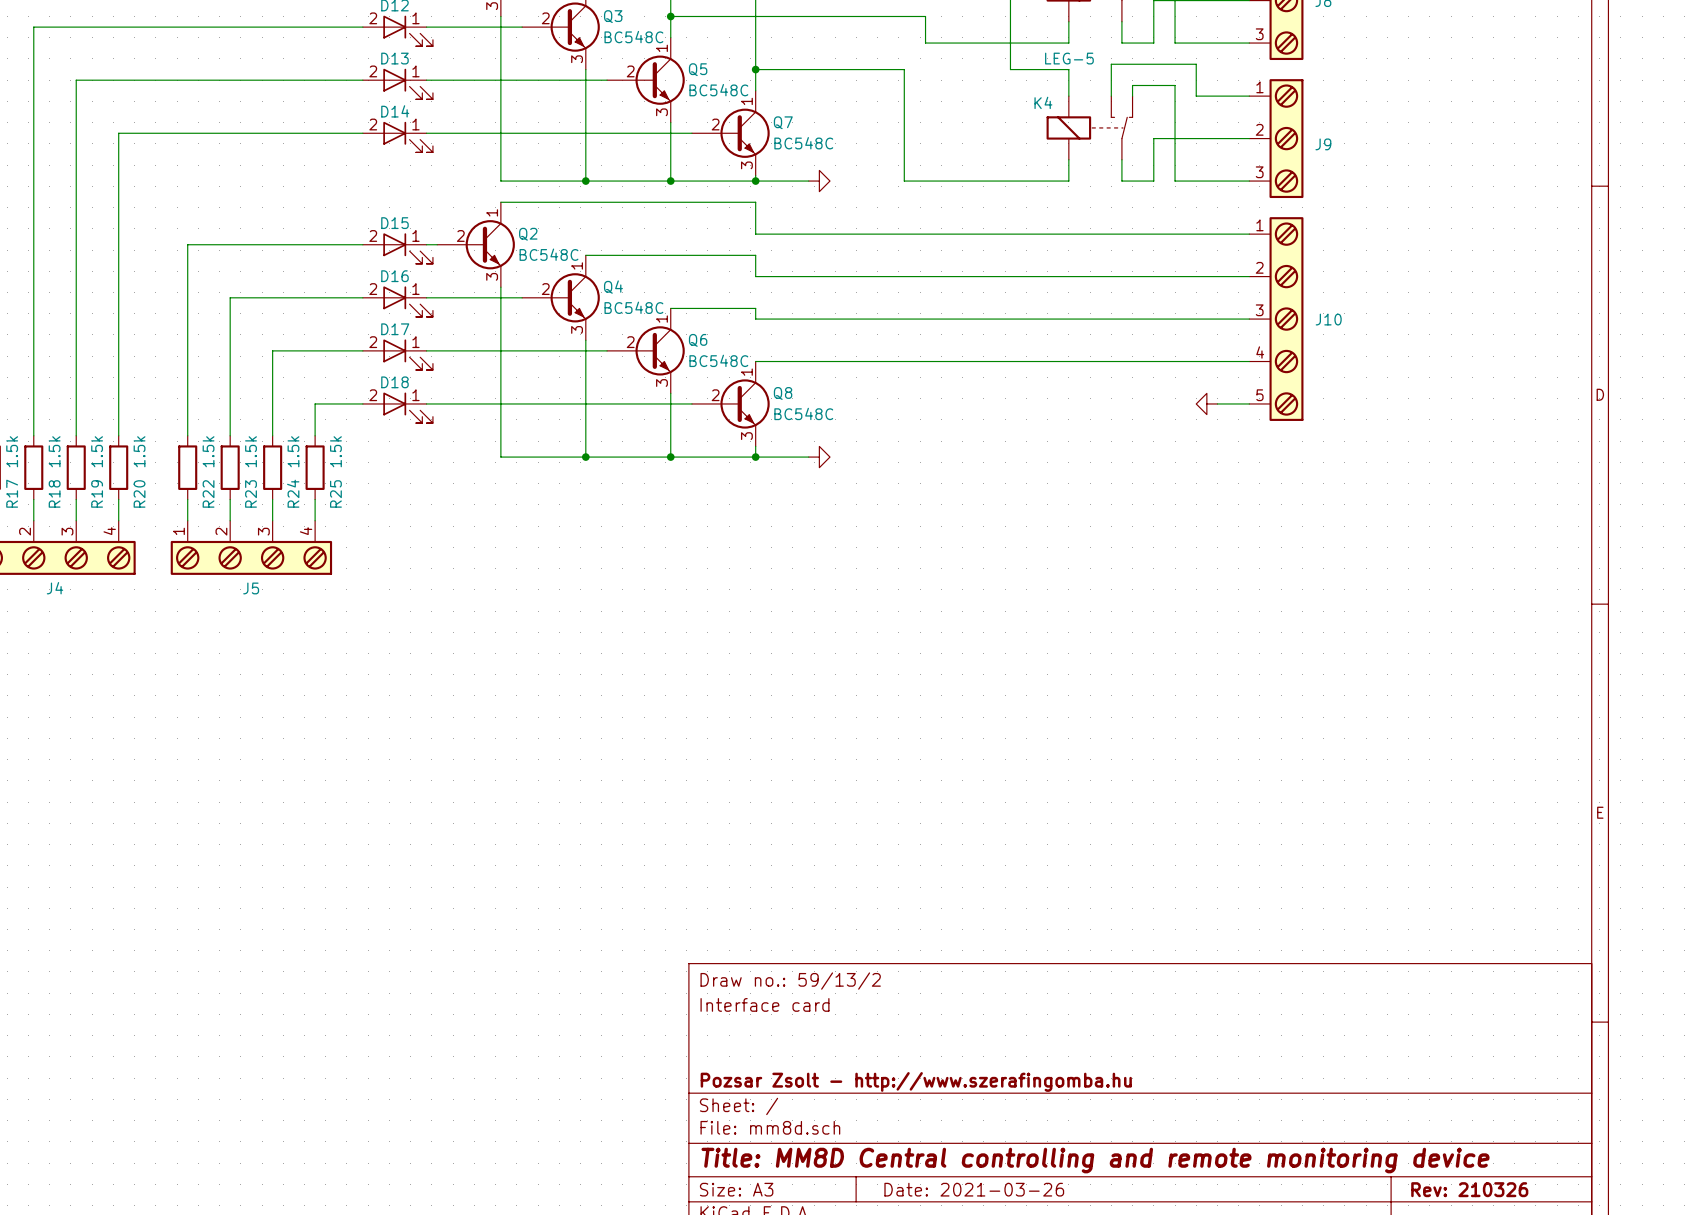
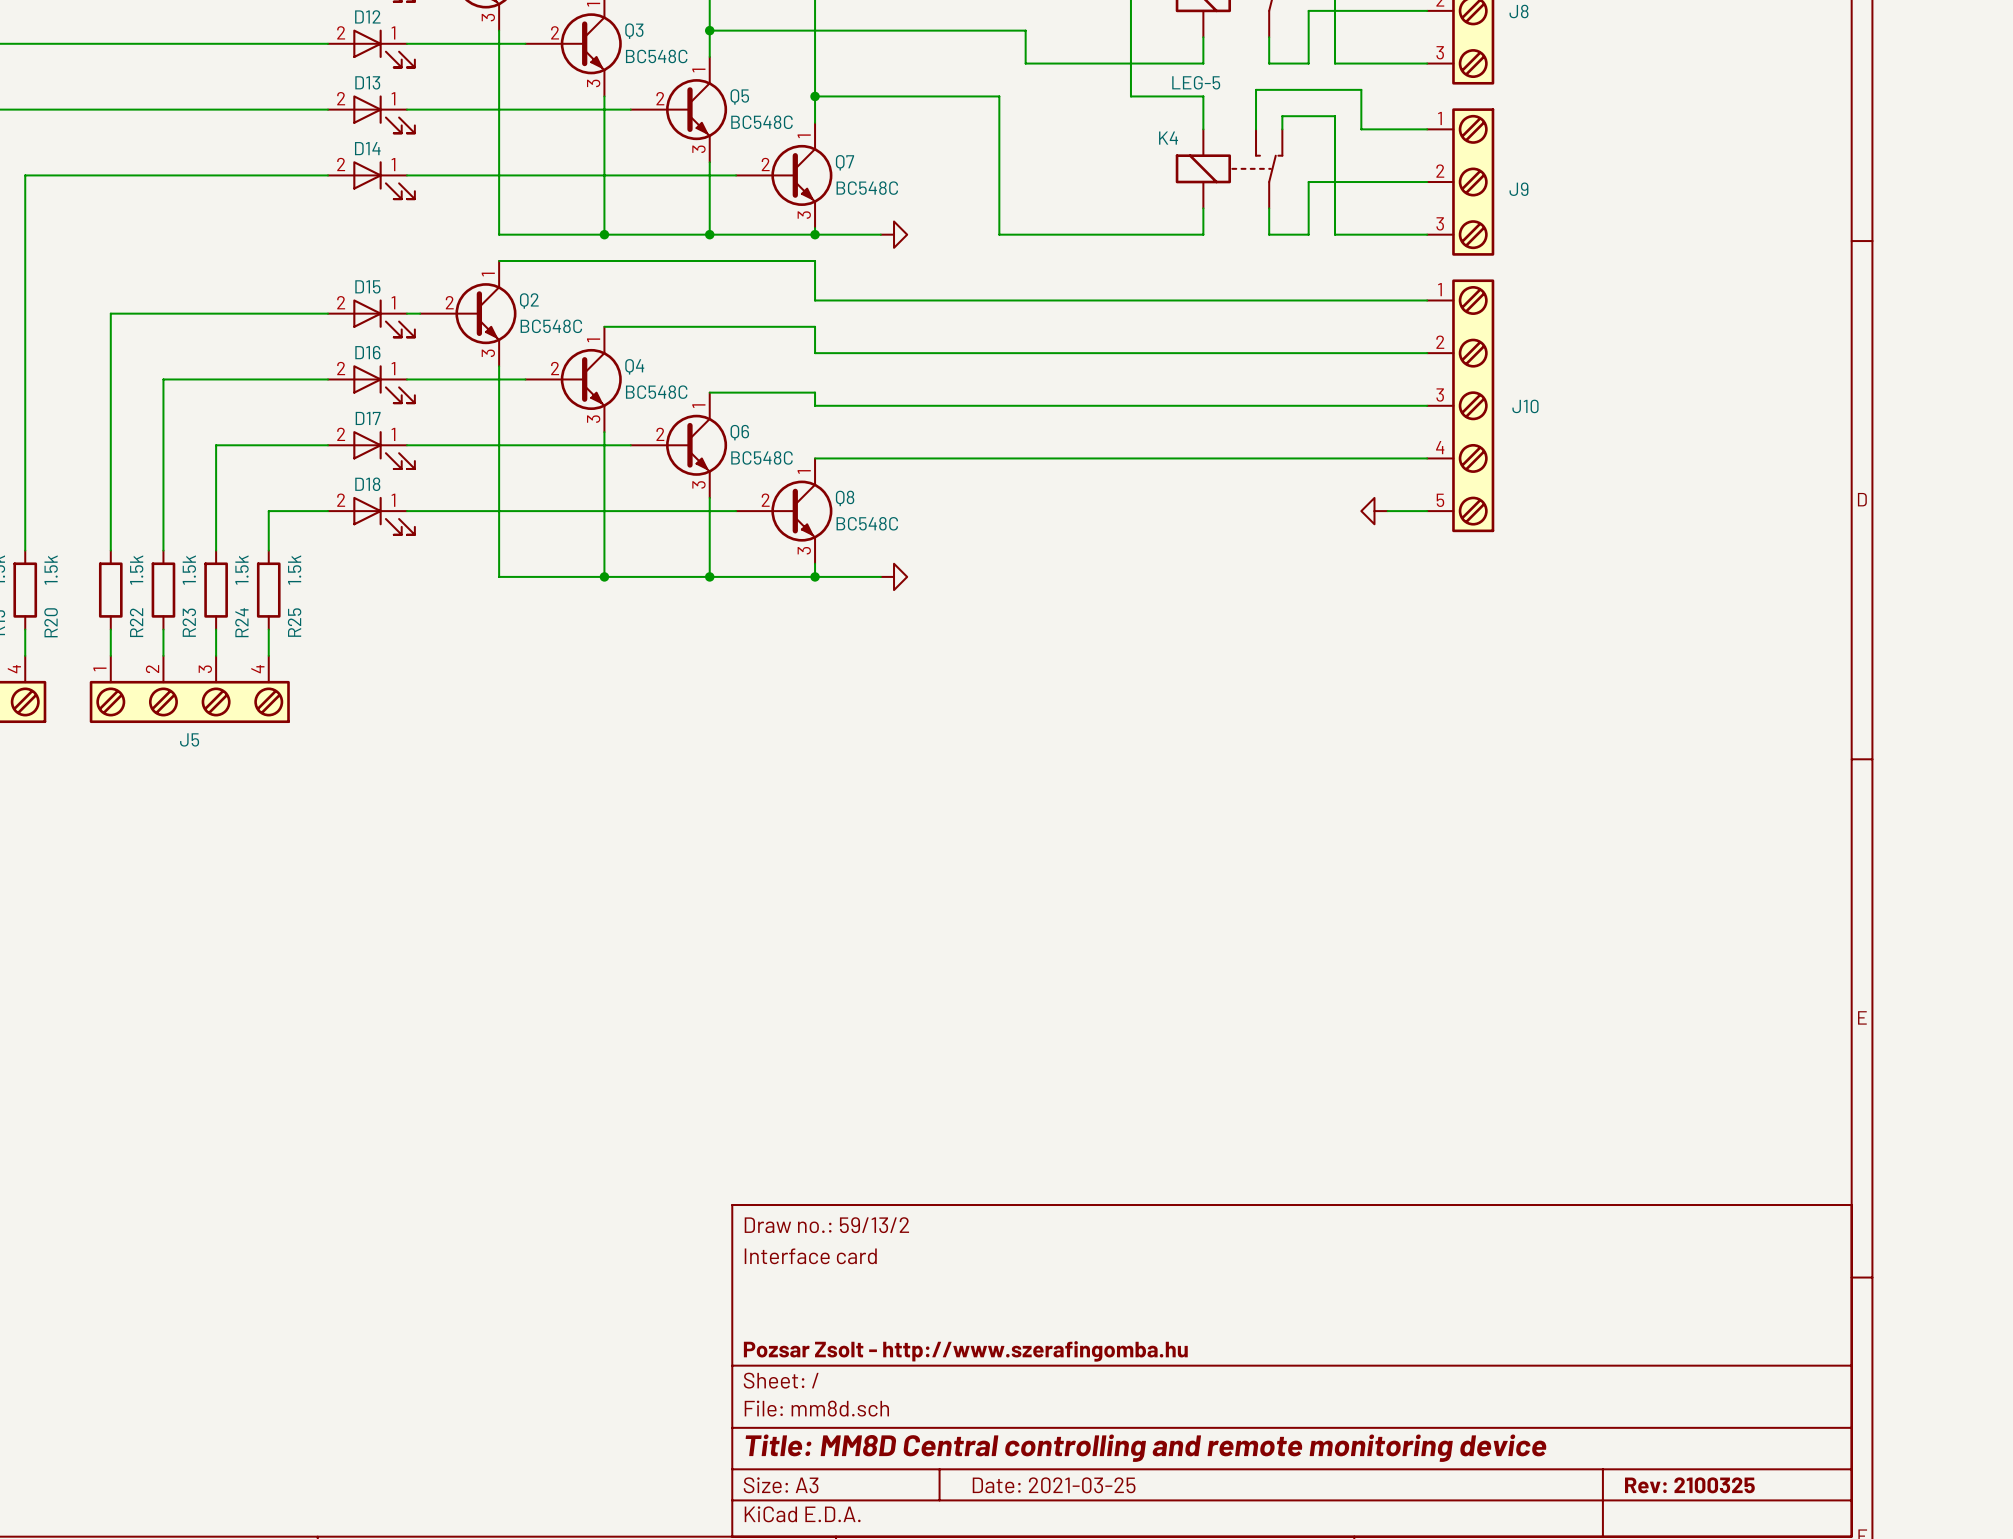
title block: Date: 2021-03-26 (974, 1189) -> Date: 2021-03-25 (1054, 1485)
title block: Rev: 210326 (1469, 1189) -> Rev: 2100325 (1689, 1485)

